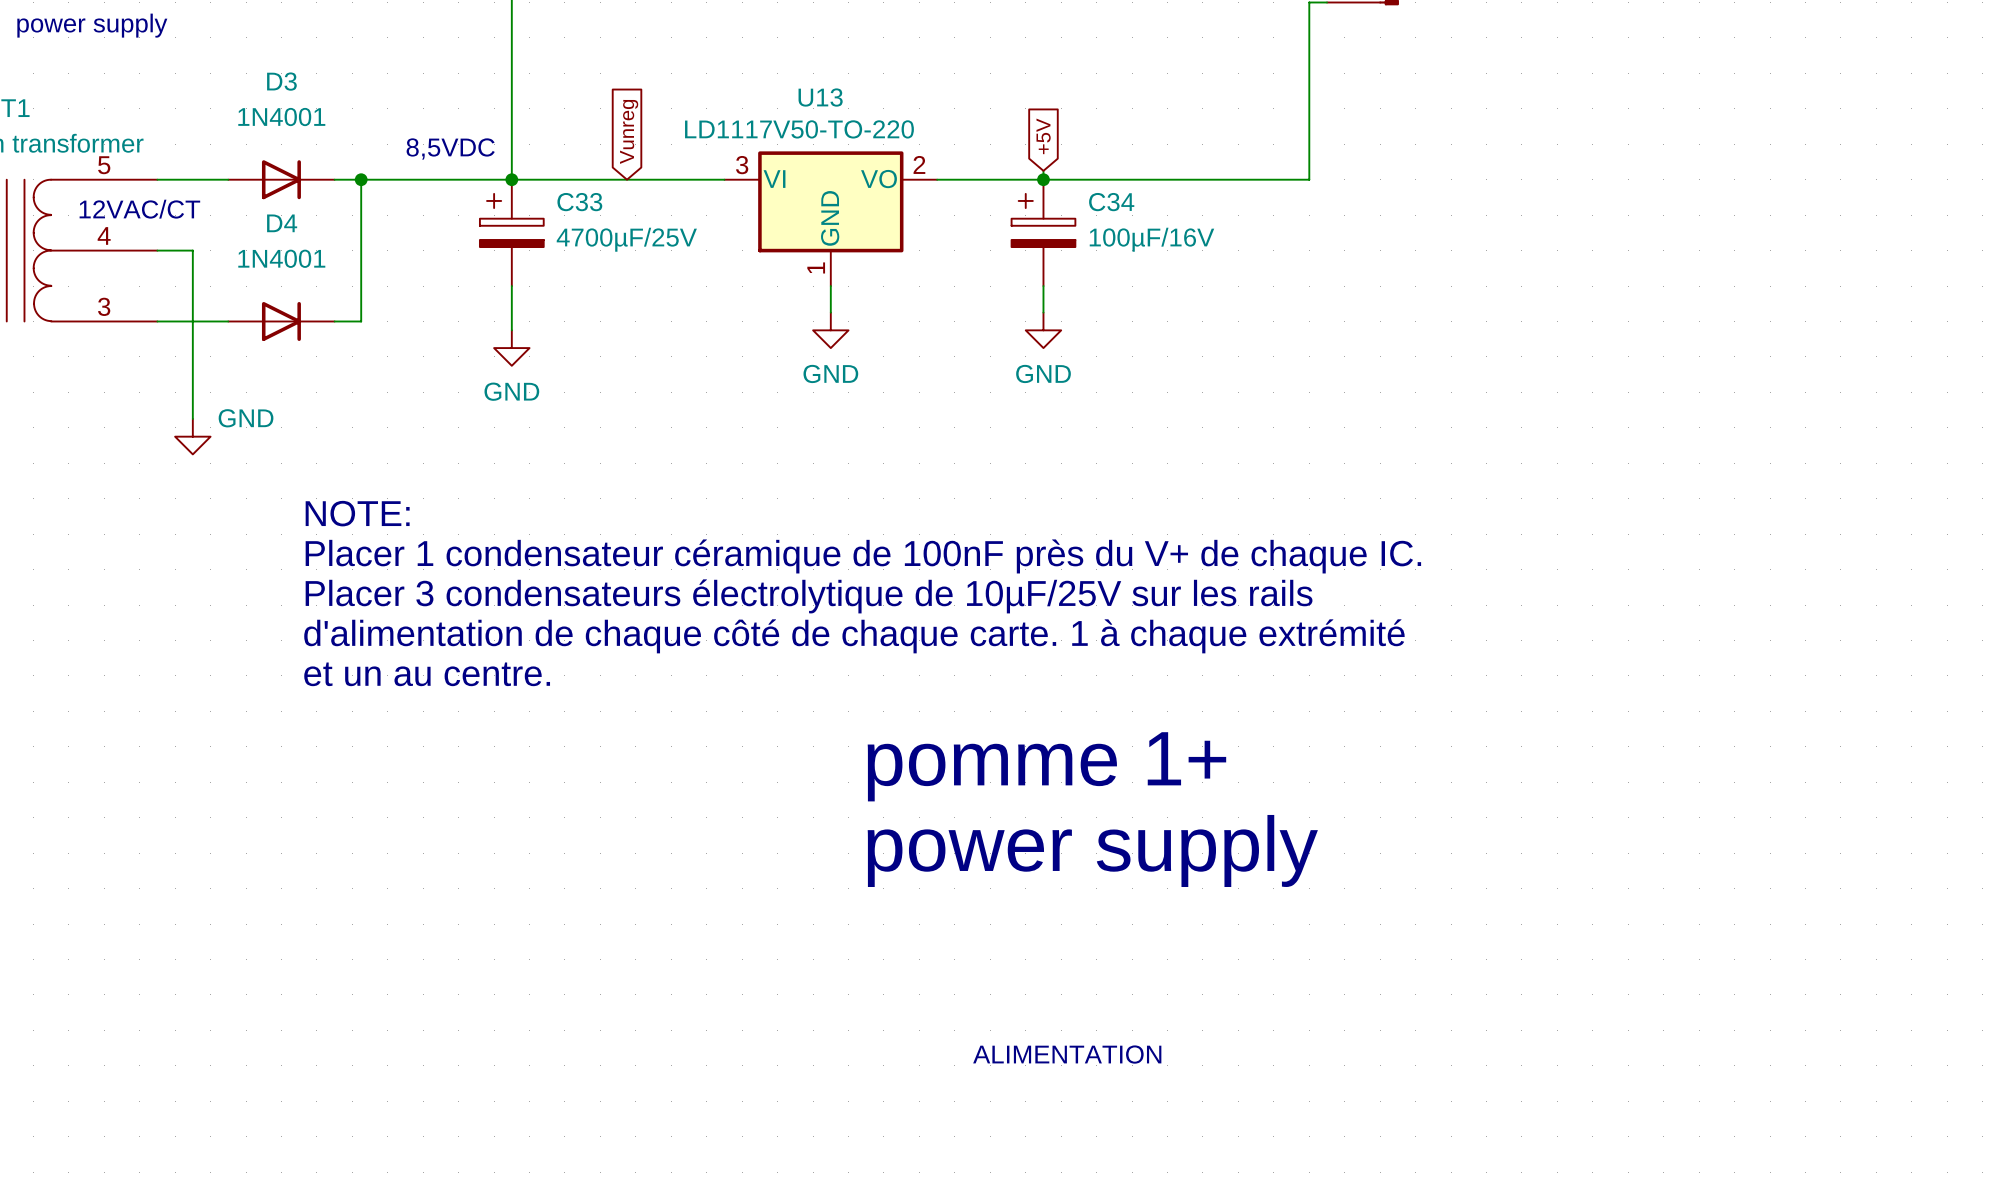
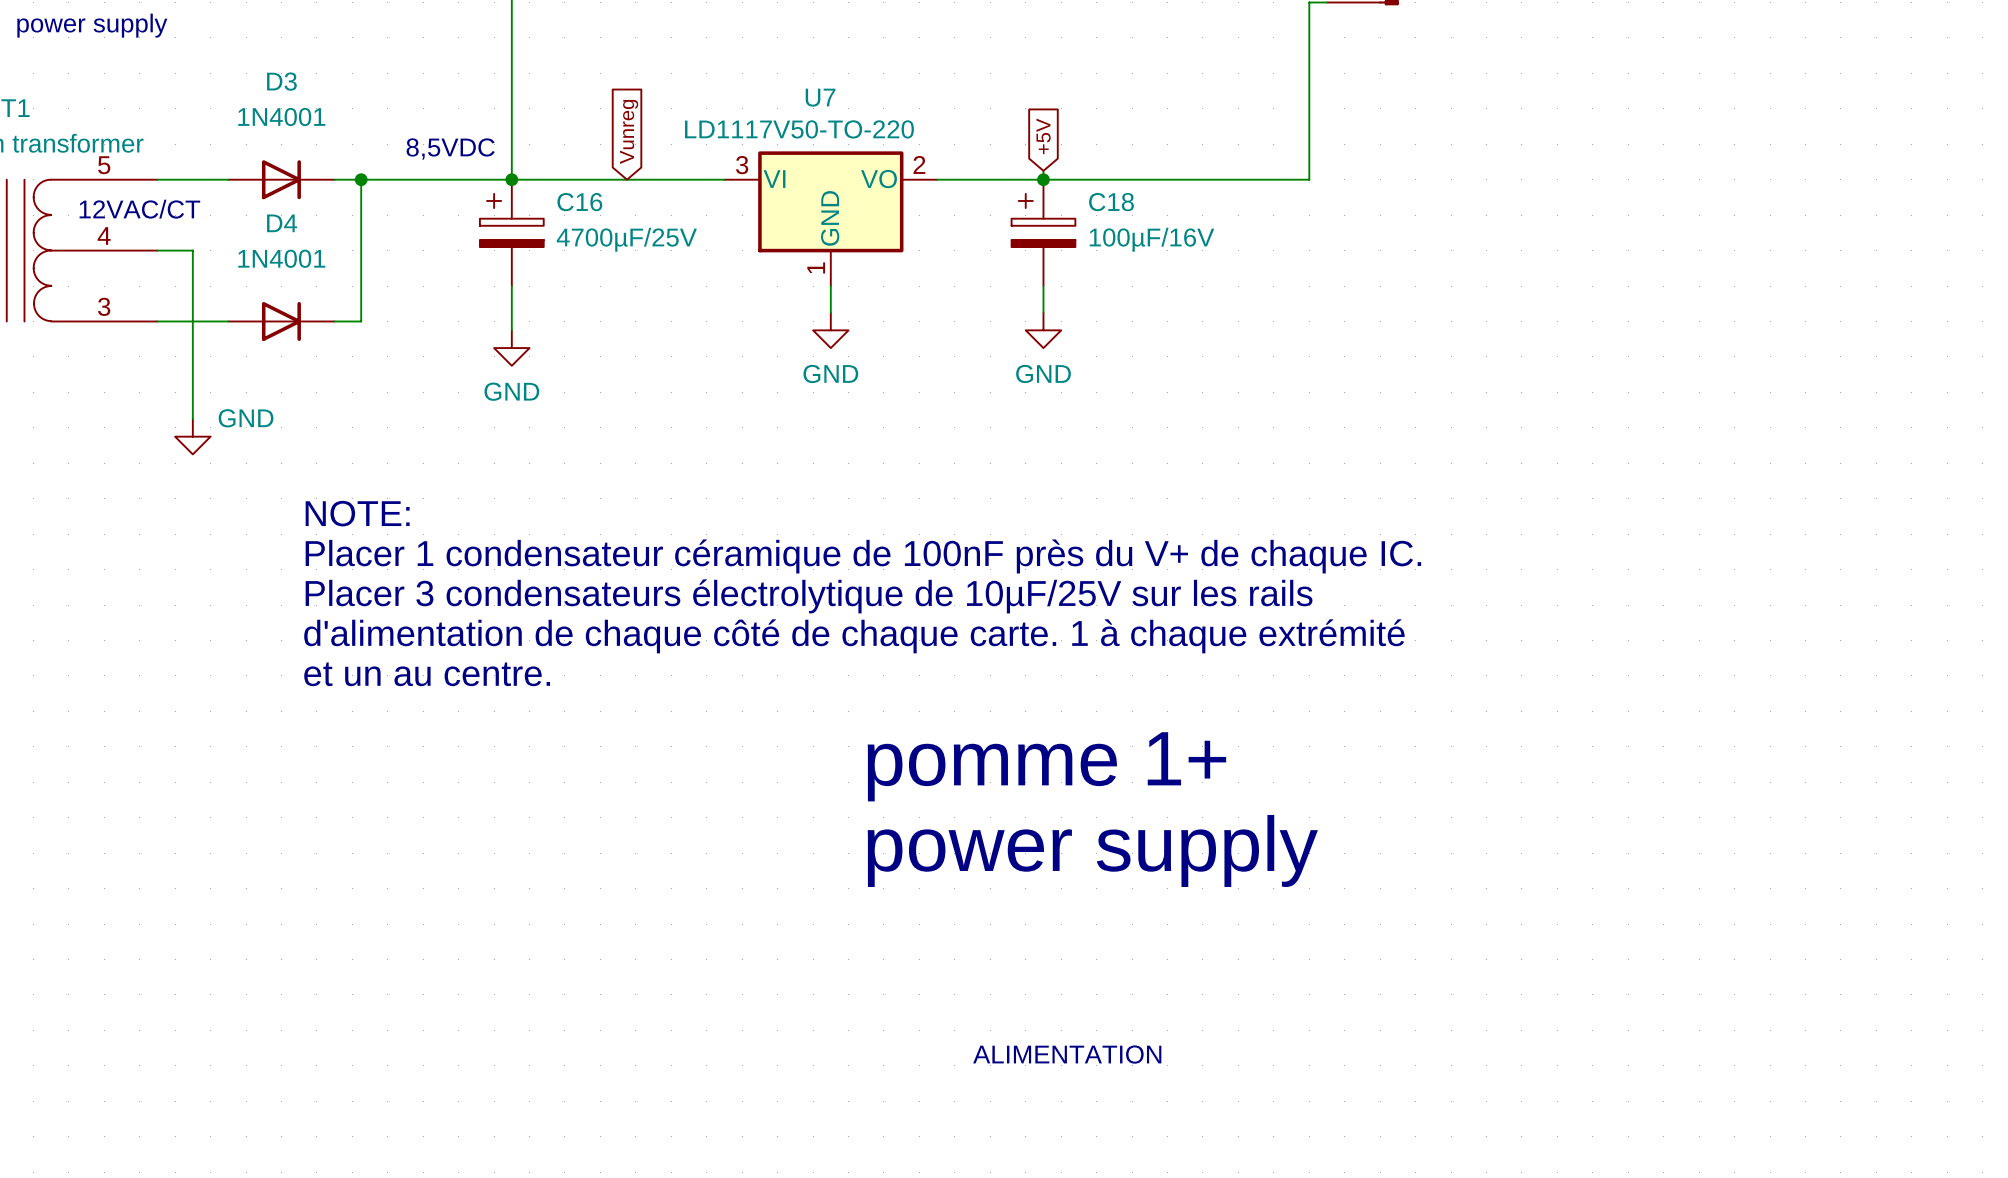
U13 name: U13 (820, 97) -> U7 (820, 97)
C33 name: C33 (579, 202) -> C16 (579, 202)
C34 name: C34 (1111, 202) -> C18 (1111, 202)

